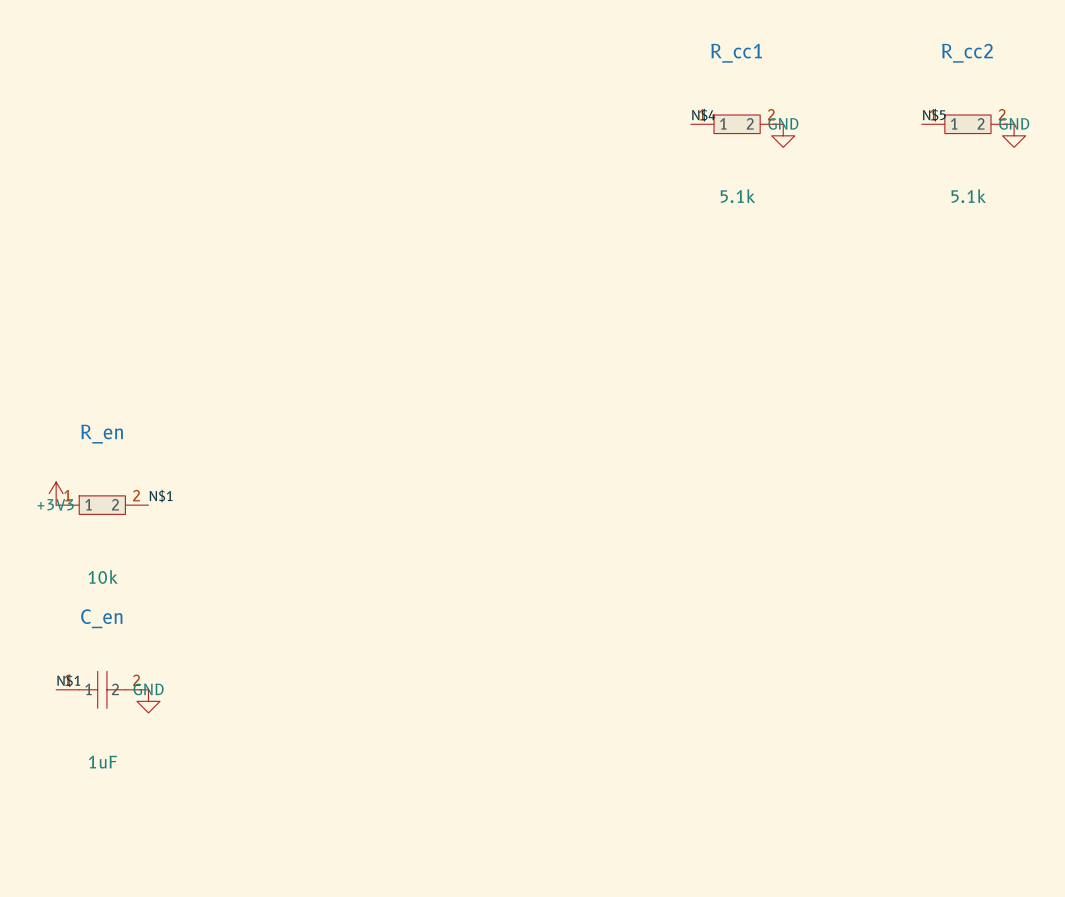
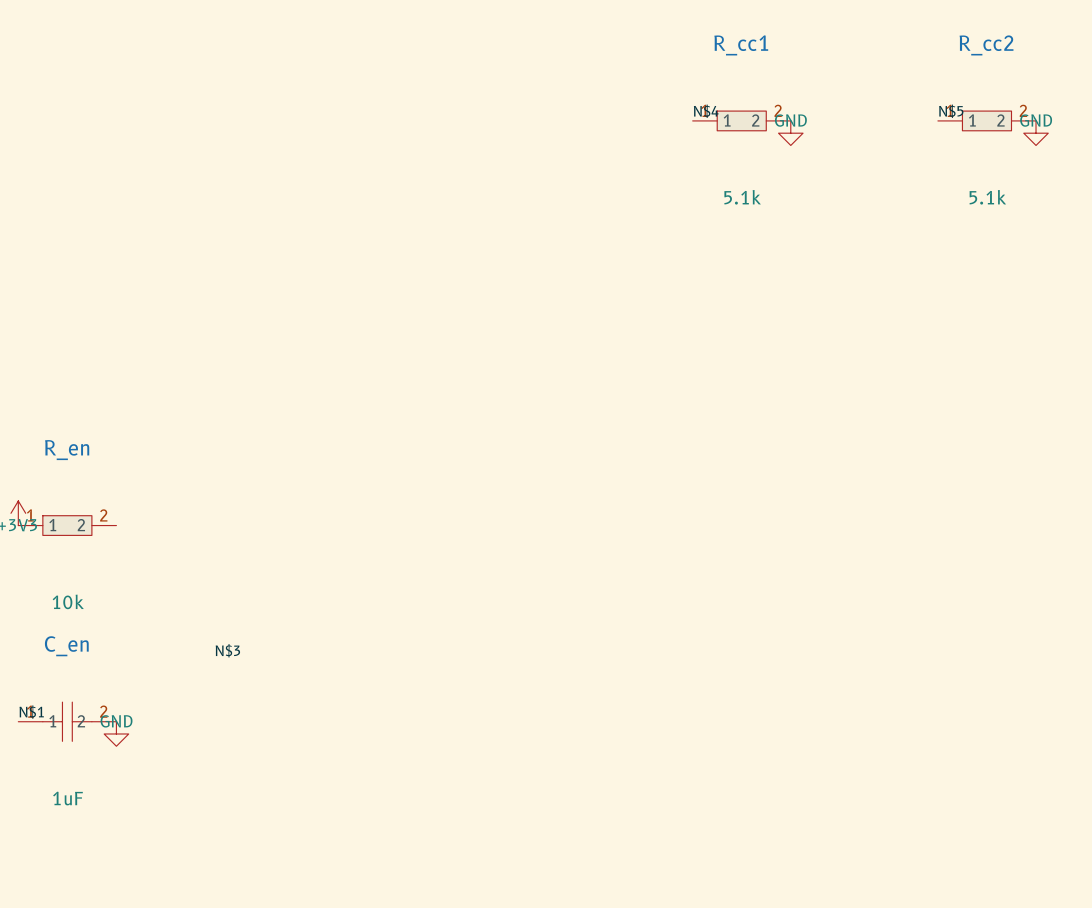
label: N$1 (161, 496) -> none
label: none -> N$3 (227, 650)

